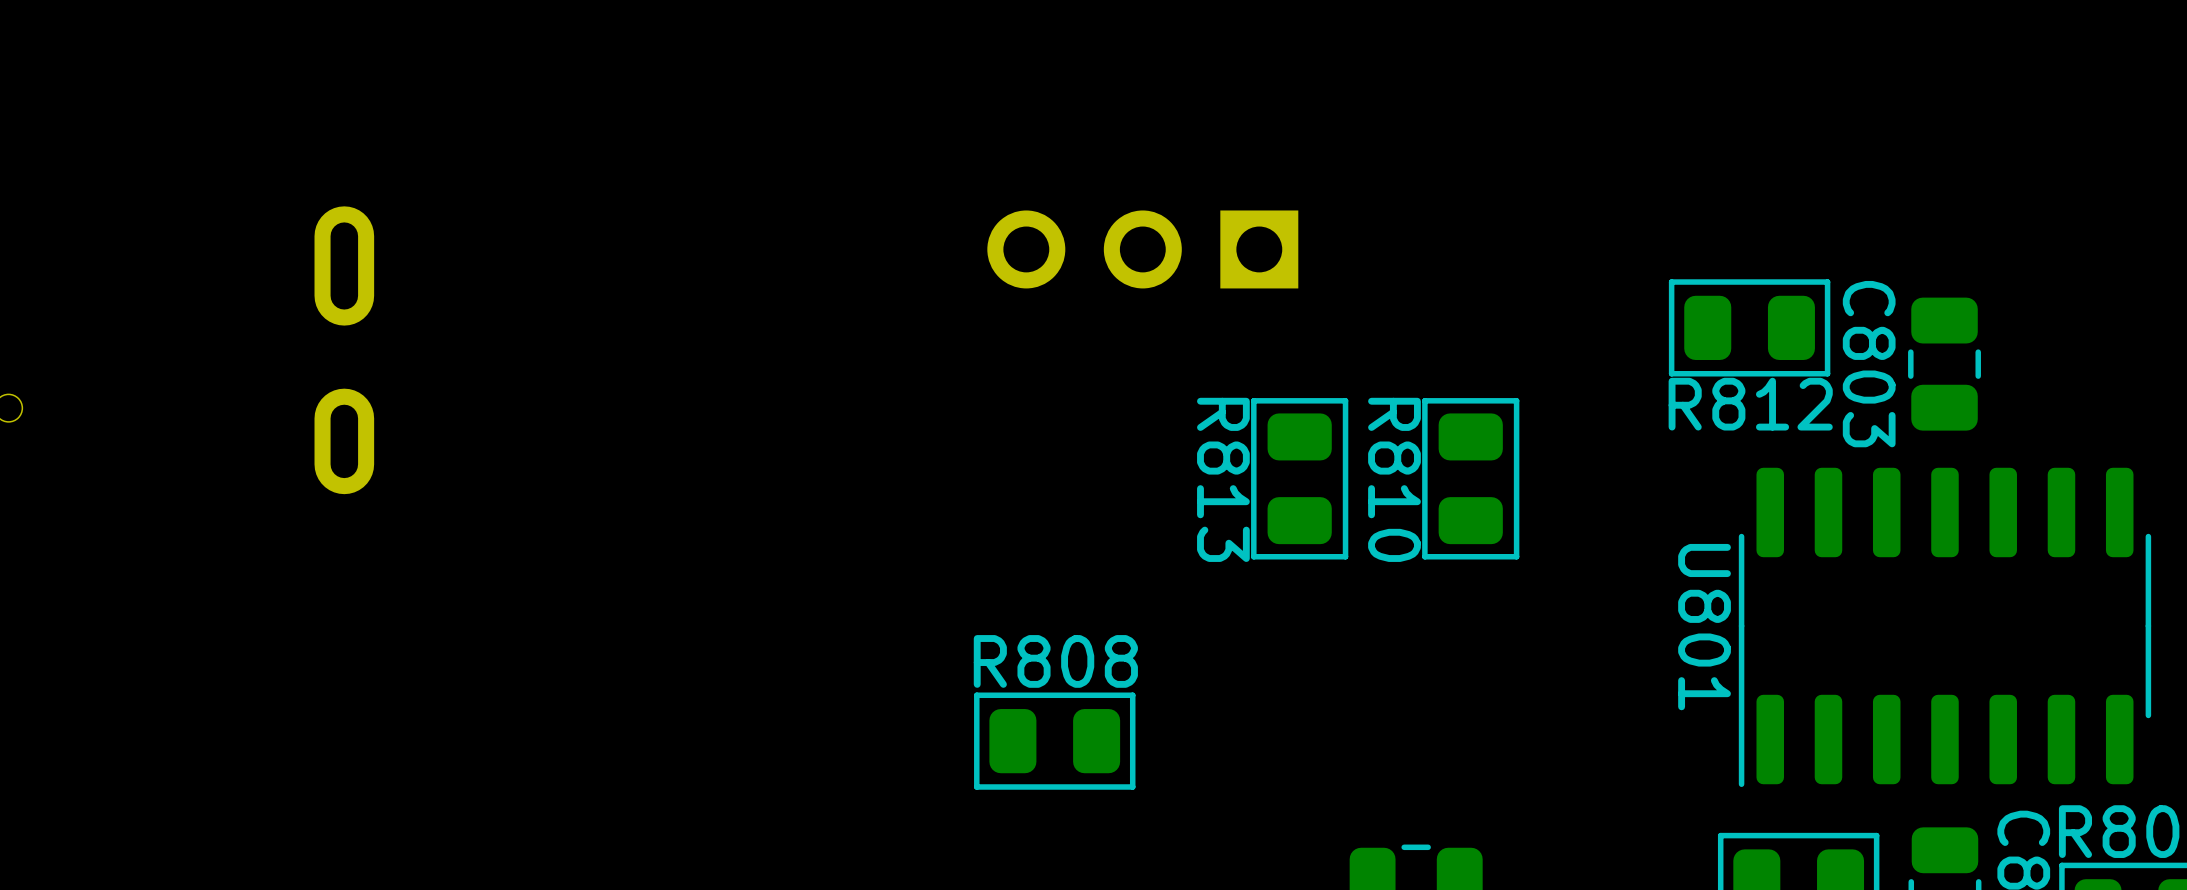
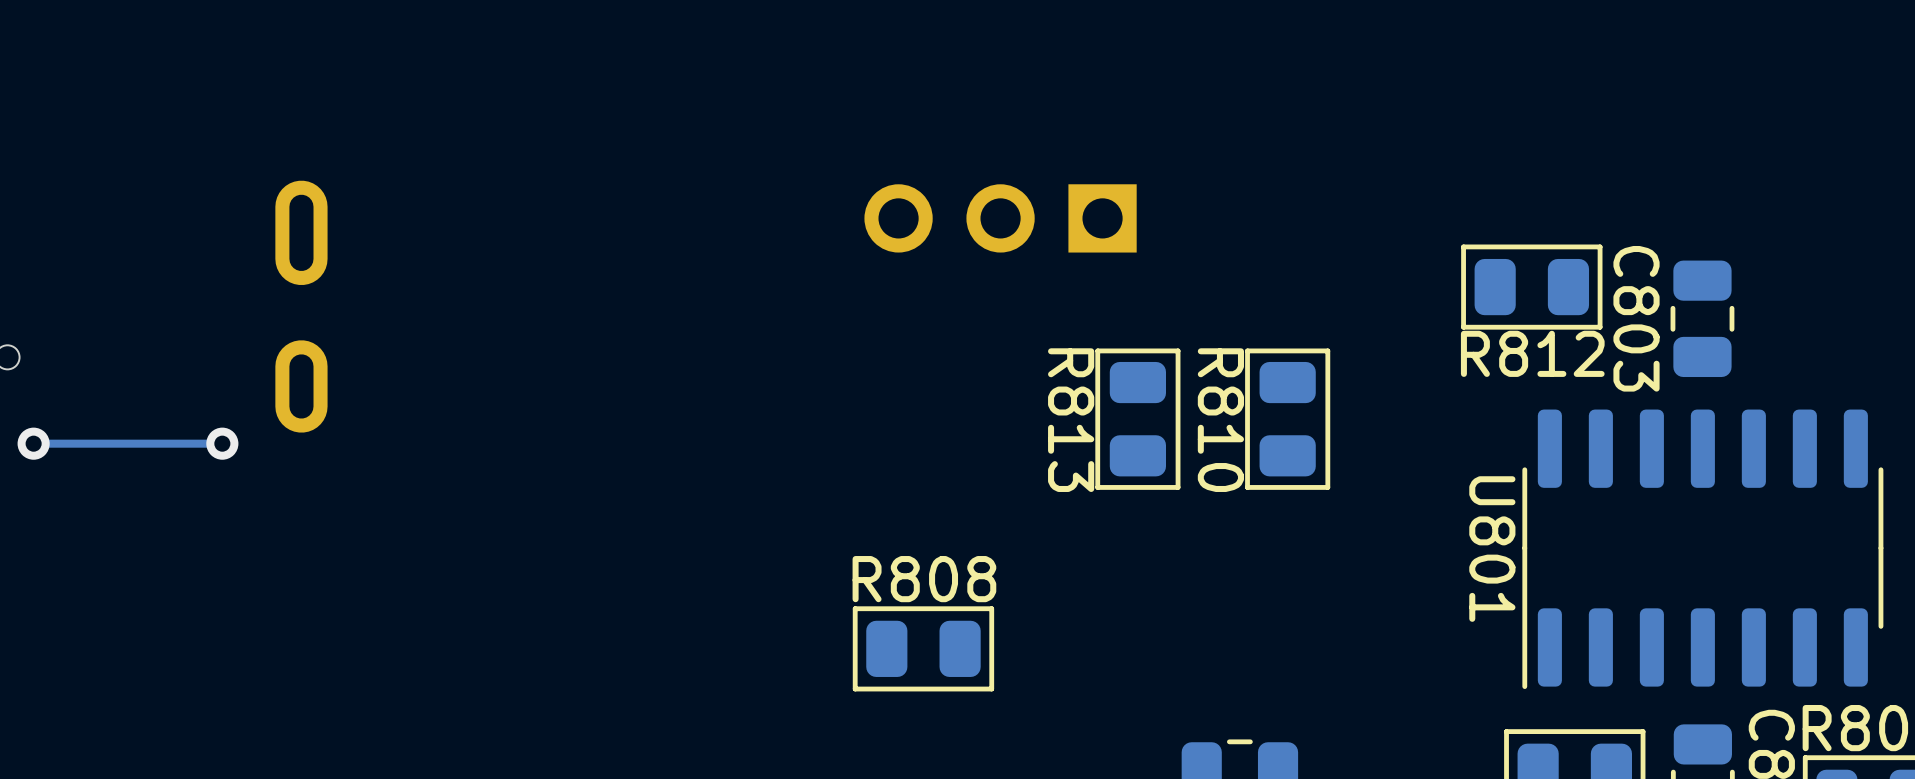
via: none -> (33, 443)
track: none -> (222, 443) (33, 443)
via: none -> (222, 443)

